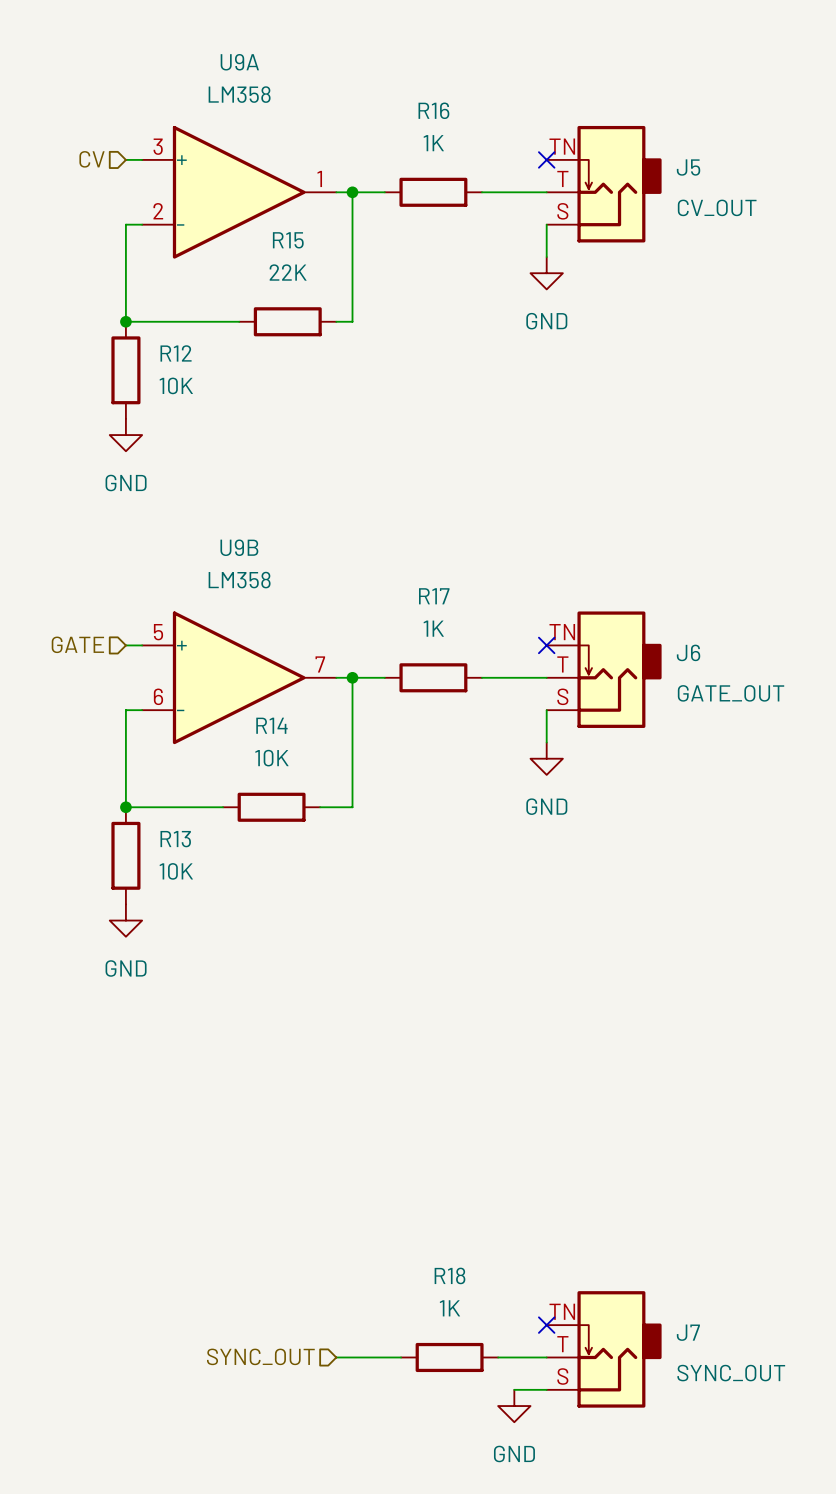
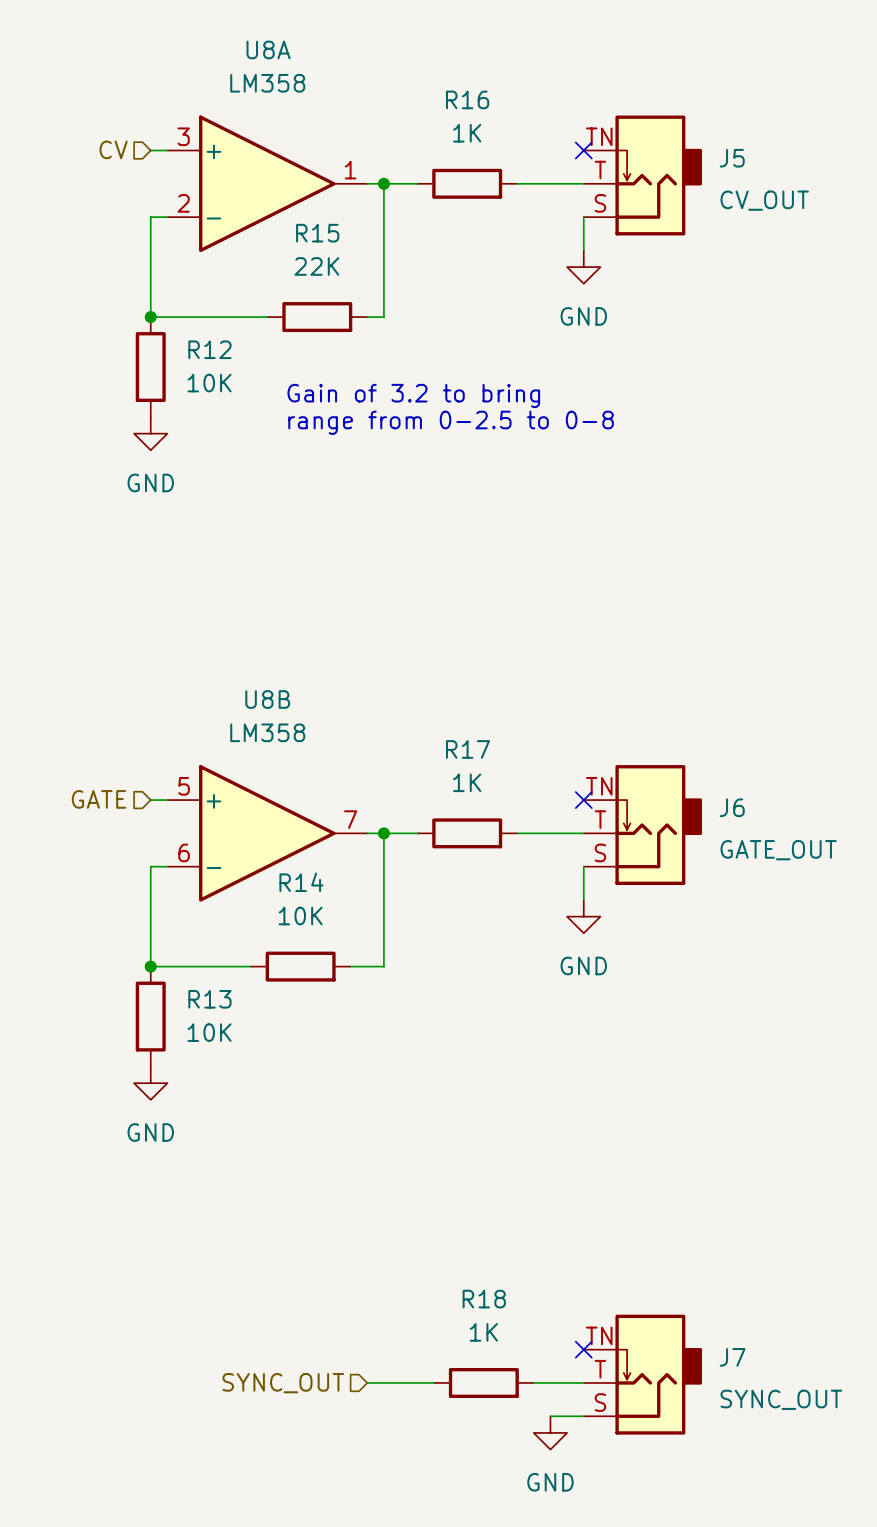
U9A name: U9A (239, 62) -> U8A (268, 49)
text: none -> Gain of 3.2 to bring (413, 395)
text: none -> range from 0-2.5 to 0-8 (451, 422)
hierarchical label position: GATE (77, 644) -> GATE (98, 799)
wire: (125, 645) (142, 645) -> (150, 800) (167, 800)
no-connect mark: (546, 645) -> none
J6 position: (604, 669) -> (642, 825)
U9B: LM358 (239, 677) -> none
wire: (336, 677) (384, 677) -> (367, 833) (417, 833)
wire: (352, 677) (352, 807) (320, 807) -> (383, 833) (383, 966) (350, 966)
junction: (352, 677) -> none
R17 position: (433, 677) -> (467, 833)
wire: (481, 677) (546, 677) -> (517, 833) (583, 833)
wire: (142, 710) (125, 710) (125, 807) (223, 807) -> (167, 866) (150, 866) (150, 966) (250, 966)
wire: (546, 710) (546, 742) -> (583, 866) (583, 899)
power symbol position: GND (546, 758) -> GND (583, 916)
no-connect mark: none -> (583, 800)
junction: (125, 807) -> none
R14 position: (271, 807) -> (300, 966)
U8B: none -> LM358 (267, 833)
junction: none -> (383, 833)
R13 position: (125, 855) -> (150, 1016)
power symbol position: GND (125, 920) -> GND (150, 1083)
junction: none -> (150, 966)

